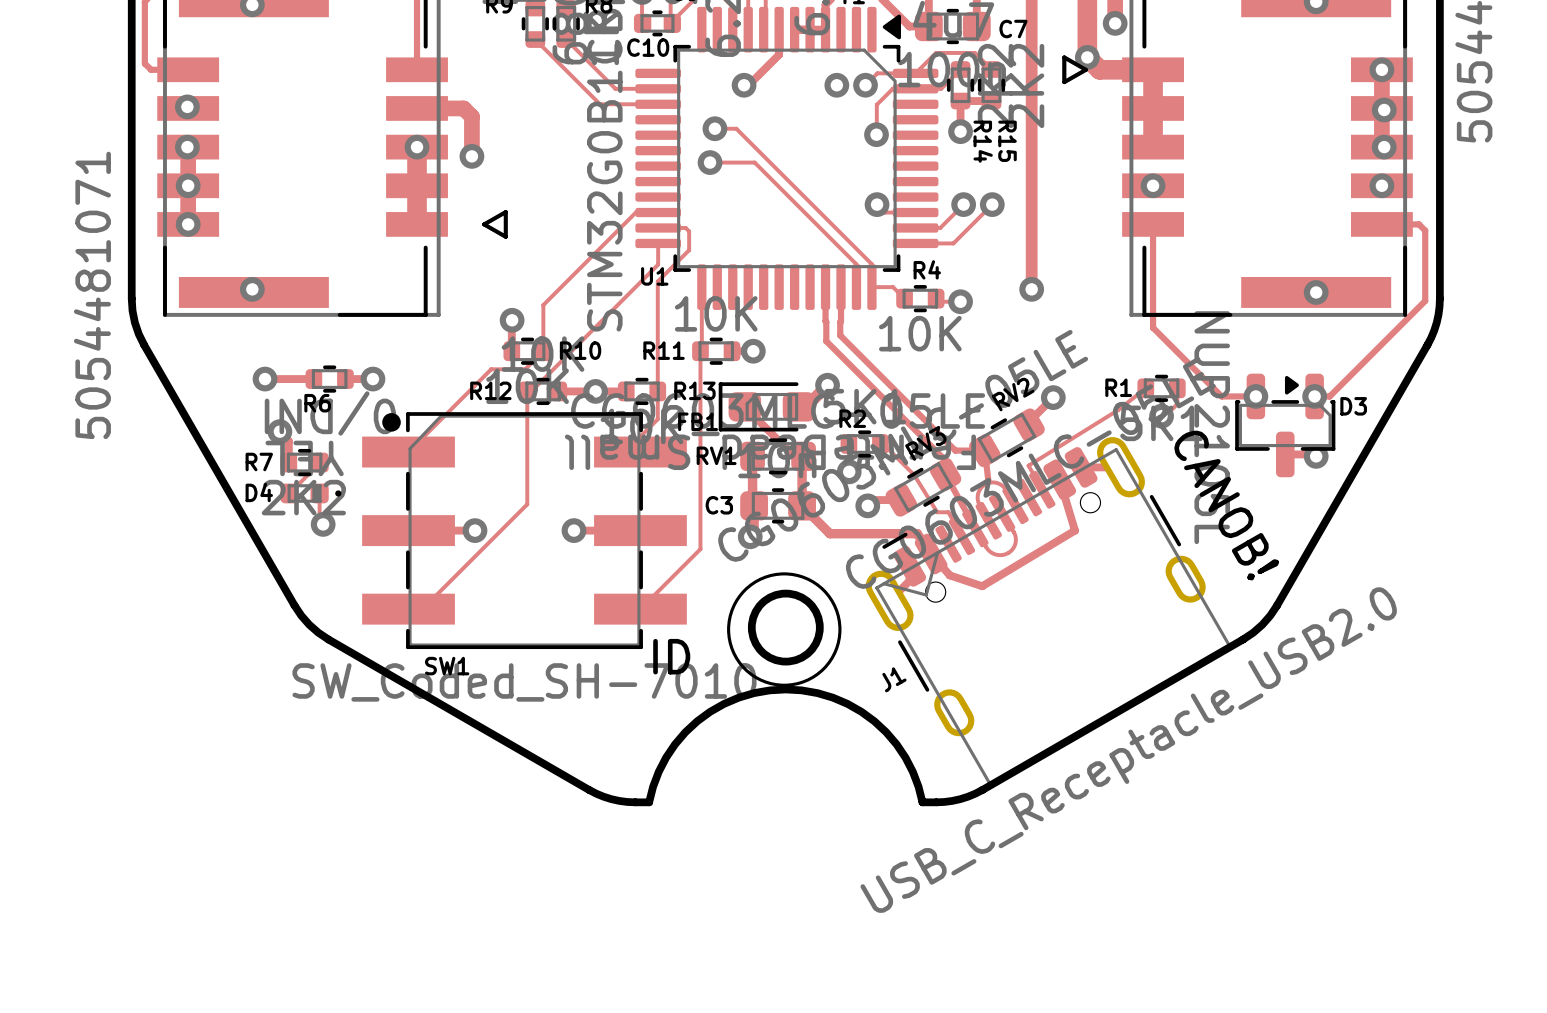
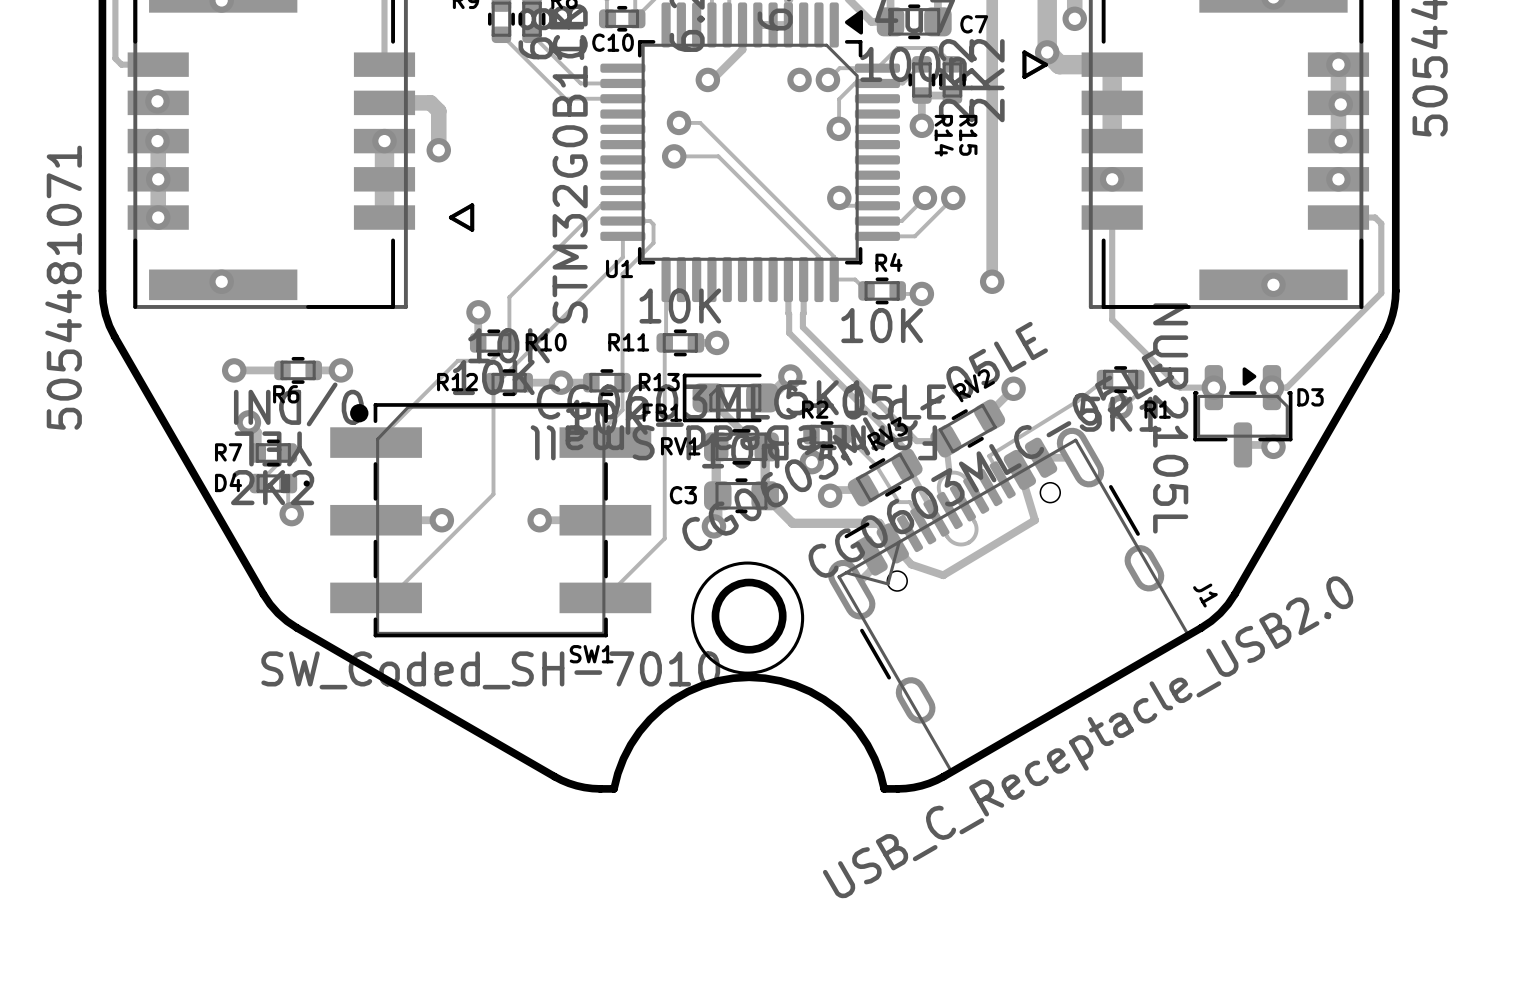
R1 name position: R1 (1118, 387) -> R1 (1157, 409)
text: CANOB! (1226, 505) -> none
text: ID (671, 656) -> none
SW1 name position: SW1 (447, 666) -> SW1 (591, 654)
J1 name rotation: 0° (894, 679) -> 90° clockwise (1205, 595)
J1 name position: J1 (894, 679) -> J1 (1205, 595)

